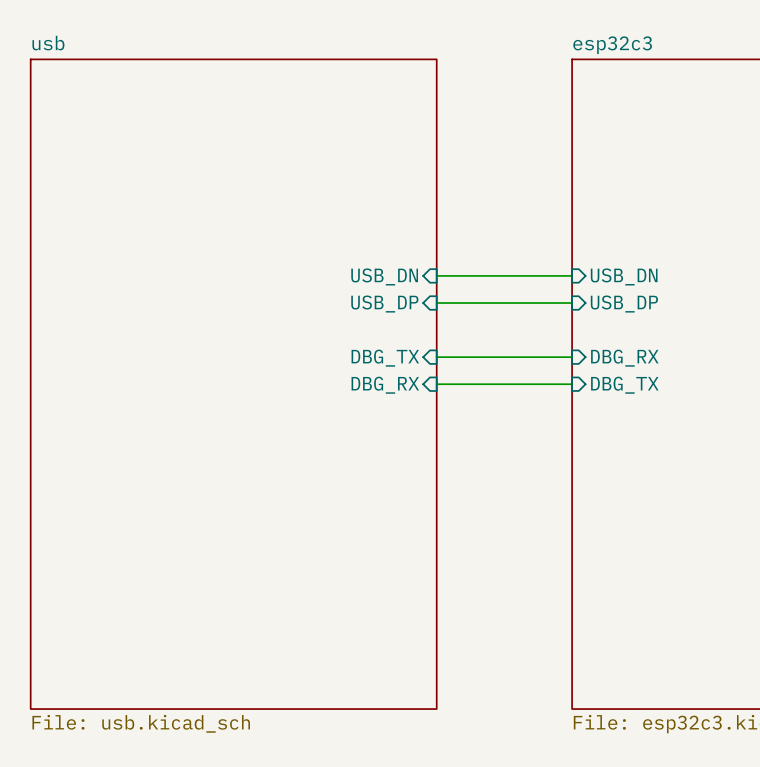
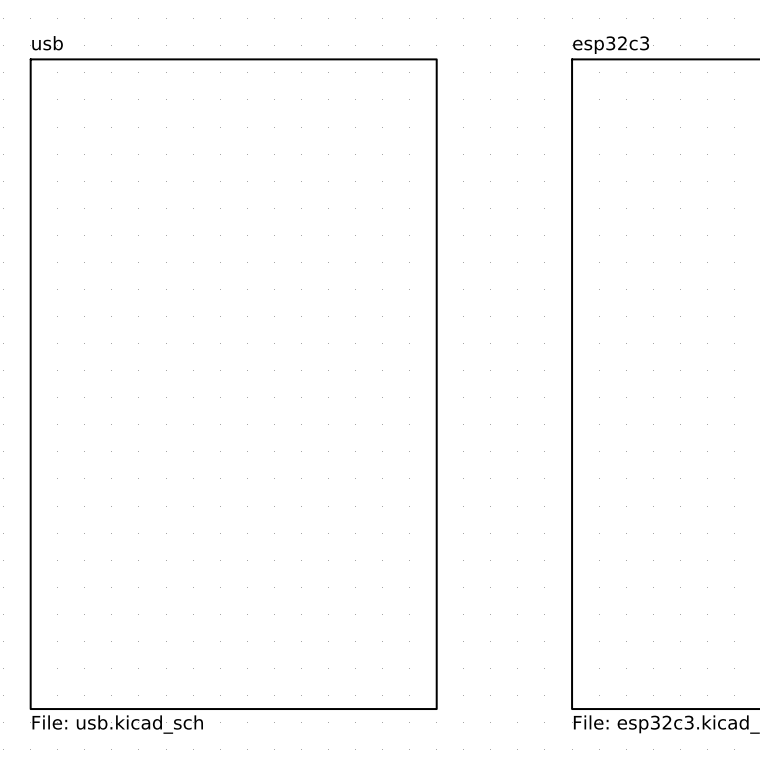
wire: (436, 275) (572, 275) -> none
sheet pin: USB_DN (384, 276) -> none
sheet pin: USB_DN (624, 276) -> none
wire: (436, 303) (572, 303) -> none
sheet pin: USB_DP (384, 304) -> none
sheet pin: USB_DP (624, 304) -> none
wire: (436, 357) (572, 357) -> none
sheet pin: DBG_TX (385, 358) -> none
sheet pin: DBG_RX (624, 358) -> none
wire: (436, 384) (572, 384) -> none
sheet pin: DBG_RX (385, 385) -> none
sheet pin: DBG_TX (624, 385) -> none

